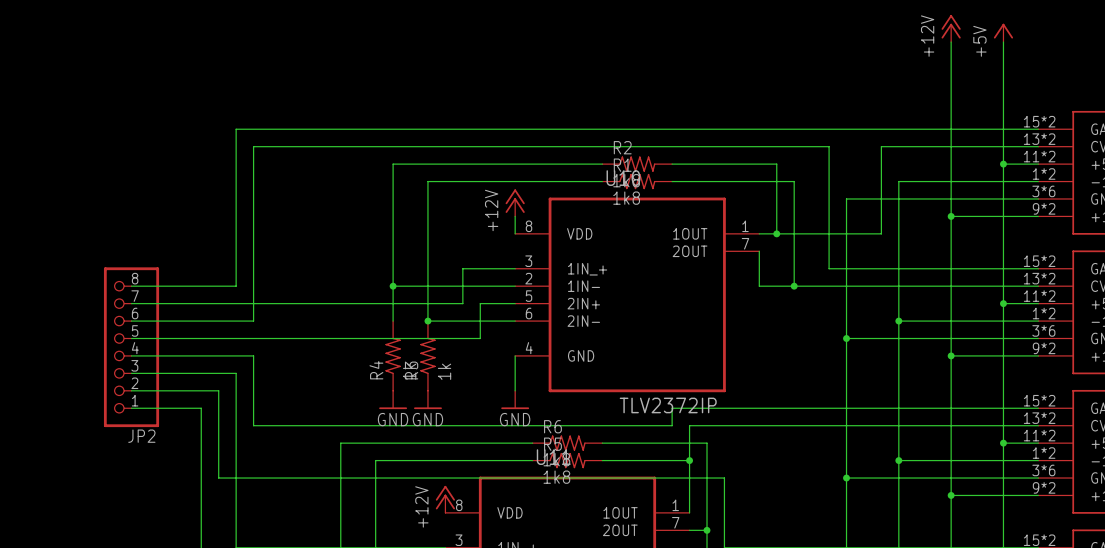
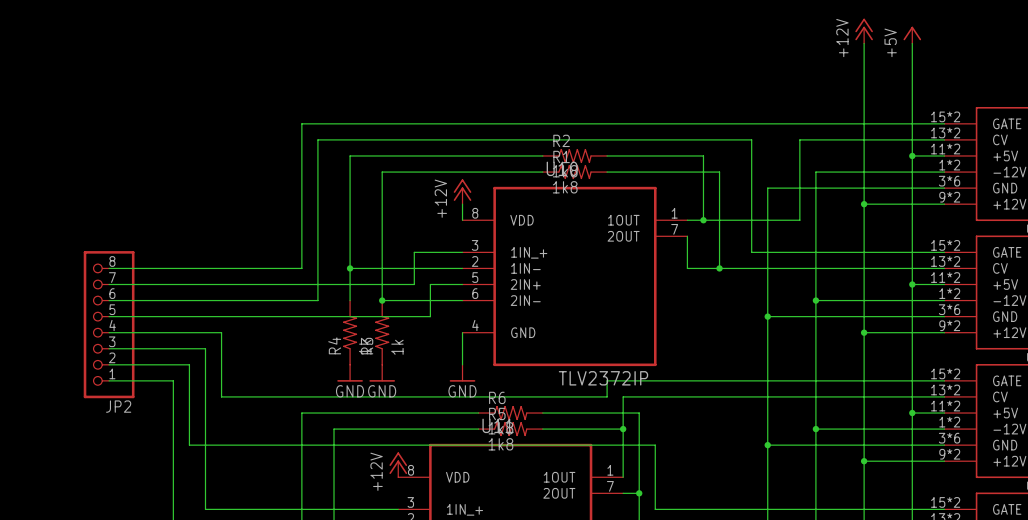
wire: (340, 129) (236, 129) (236, 286) -> (301, 123) (301, 268) (205, 268)
wire: (358, 146) (253, 146) (253, 321) -> (317, 139) (317, 300) (221, 300)

